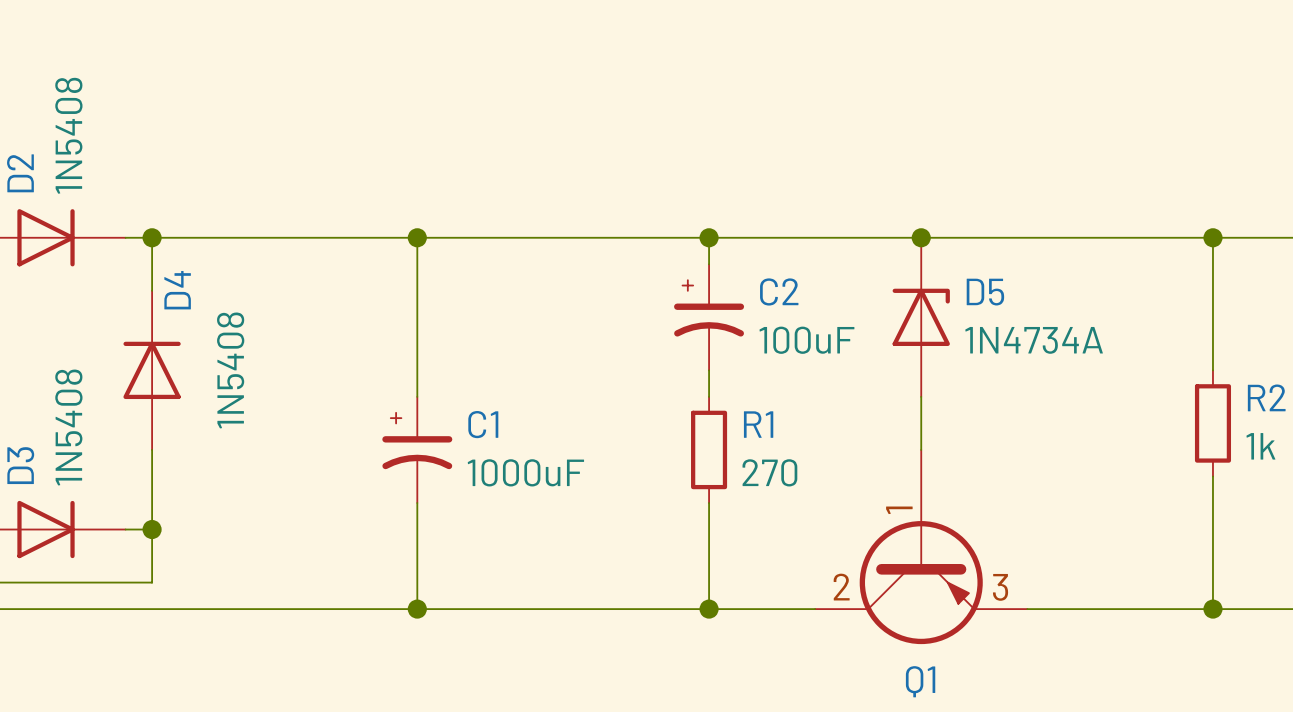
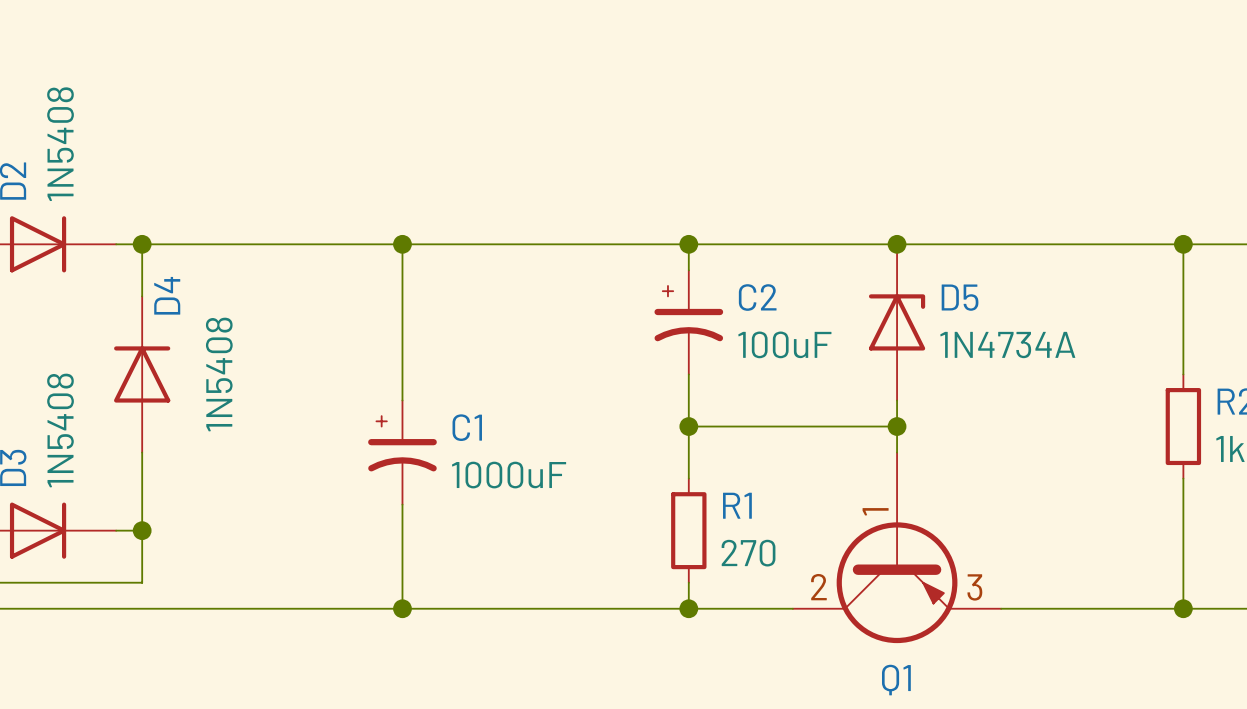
wire: none -> (688, 426) (897, 426)
junction: none -> (688, 426)
junction: none -> (897, 426)
R1 position: (709, 449) -> (688, 530)
wire: (709, 503) (709, 582) -> (688, 400) (688, 478)

